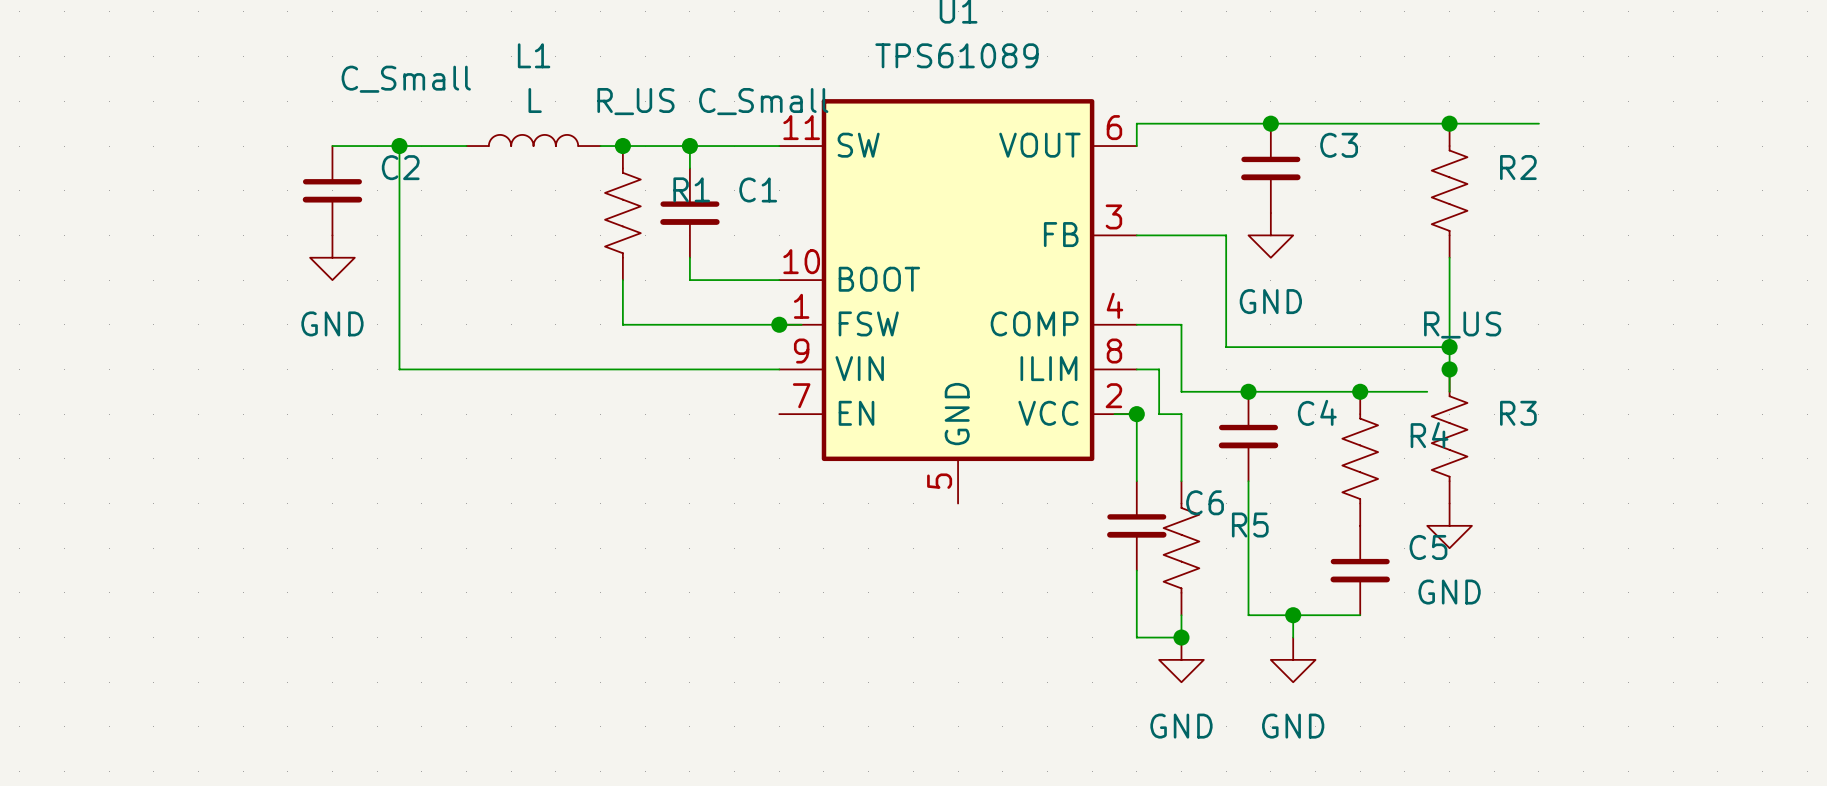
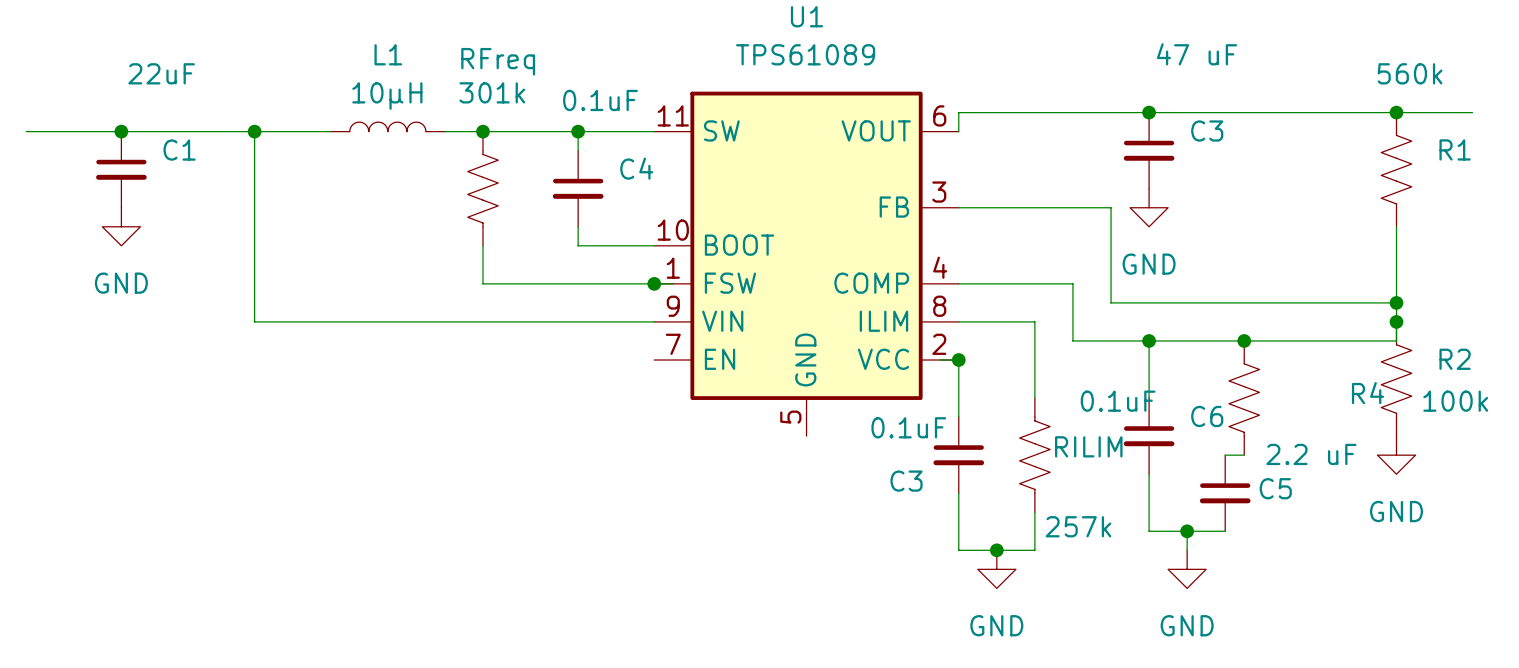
L1 value: L (535, 100) -> 10µH (387, 96)
R1 value: R_US (635, 101) -> 560k (1410, 73)
C1 value: C_Small (763, 101) -> 0.1uF (600, 100)
junction: (1270, 123) -> none
junction: none -> (1149, 112)
junction: (1449, 123) -> none
wire: none -> (1301, 112) (1472, 112)
junction: none -> (1396, 112)
L1 position: (533, 140) -> (387, 126)
wire: none -> (26, 131) (273, 131)
junction: none -> (121, 131)
junction: none -> (254, 131)
junction: (399, 146) -> none
wire: (466, 146) (399, 146) (399, 369) -> (254, 131) (254, 321) (330, 321)
wire: none -> (444, 131) (502, 131)
junction position: (622, 146) -> (482, 131)
C3: (1270, 168) -> none
C3: none -> 47 uF (1149, 150)
C1 name: C1 (758, 189) -> C4 (636, 168)
C1: none -> 22uF (121, 169)
C2: C_Small (332, 190) -> none
R2 position: (1449, 190) -> (1396, 379)
RFreq: none -> 301k (482, 188)
R1 position: (622, 213) -> (1396, 169)
wire: (1226, 235) (1226, 347) (1315, 347) -> (1034, 207) (1111, 207) (1111, 302)
power symbol position: GND (1270, 235) -> GND (1149, 207)
power symbol position: GND (332, 257) -> GND (121, 226)
wire: (1449, 257) (1449, 391) -> none
wire: none -> (1396, 226) (1396, 340) (1206, 340)
wire: (622, 280) (622, 324) -> (482, 245) (482, 283) (521, 283)
wire: (1181, 324) (1181, 391) (1270, 391) -> (996, 283) (1072, 283) (1072, 340)
wire: none -> (1225, 302) (1396, 302)
junction: (1449, 347) -> none
junction: none -> (1396, 302)
wire: (1159, 369) (1159, 414) (1181, 414) (1181, 481) -> (977, 321) (1034, 321) (1034, 398)
junction: (1449, 369) -> none
junction: none -> (1396, 321)
junction: (1248, 391) -> none
wire: none -> (1149, 340) (1149, 398)
junction: none -> (1244, 340)
R4 name position: R4 (1429, 435) -> R4 (1367, 393)
C4: (1248, 436) -> none
R3: R_US (1449, 436) -> none
R4 position: (1360, 458) -> (1244, 398)
R2 value: none -> 100k (1455, 401)
wire: (1248, 481) (1248, 615) (1360, 615) -> none
C6 value: none -> 0.1uF (908, 427)
C6 name: C6 (1205, 502) -> C3 (906, 481)
C6: none -> 0.1uF (1149, 436)
RILIM: none -> 257k (1034, 455)
power symbol: GND (1449, 525) -> none
C5 value: none -> 2.2 uF (1311, 454)
power symbol: none -> GND (1396, 455)
C5 name position: C5 (1428, 547) -> C5 (1275, 488)
R5: (1181, 548) -> none
wire: none -> (1149, 474) (1149, 531) (1225, 531)
C5 position: (1360, 570) -> (1225, 493)
wire: (1181, 615) (1181, 637) -> (1034, 512) (1034, 550) (996, 550)
wire: (1293, 615) (1293, 637) -> (1187, 531) (1187, 550)
junction: (1293, 615) -> none
junction: none -> (1187, 531)
power symbol: GND (1293, 659) -> none
power symbol: none -> GND (1187, 569)

